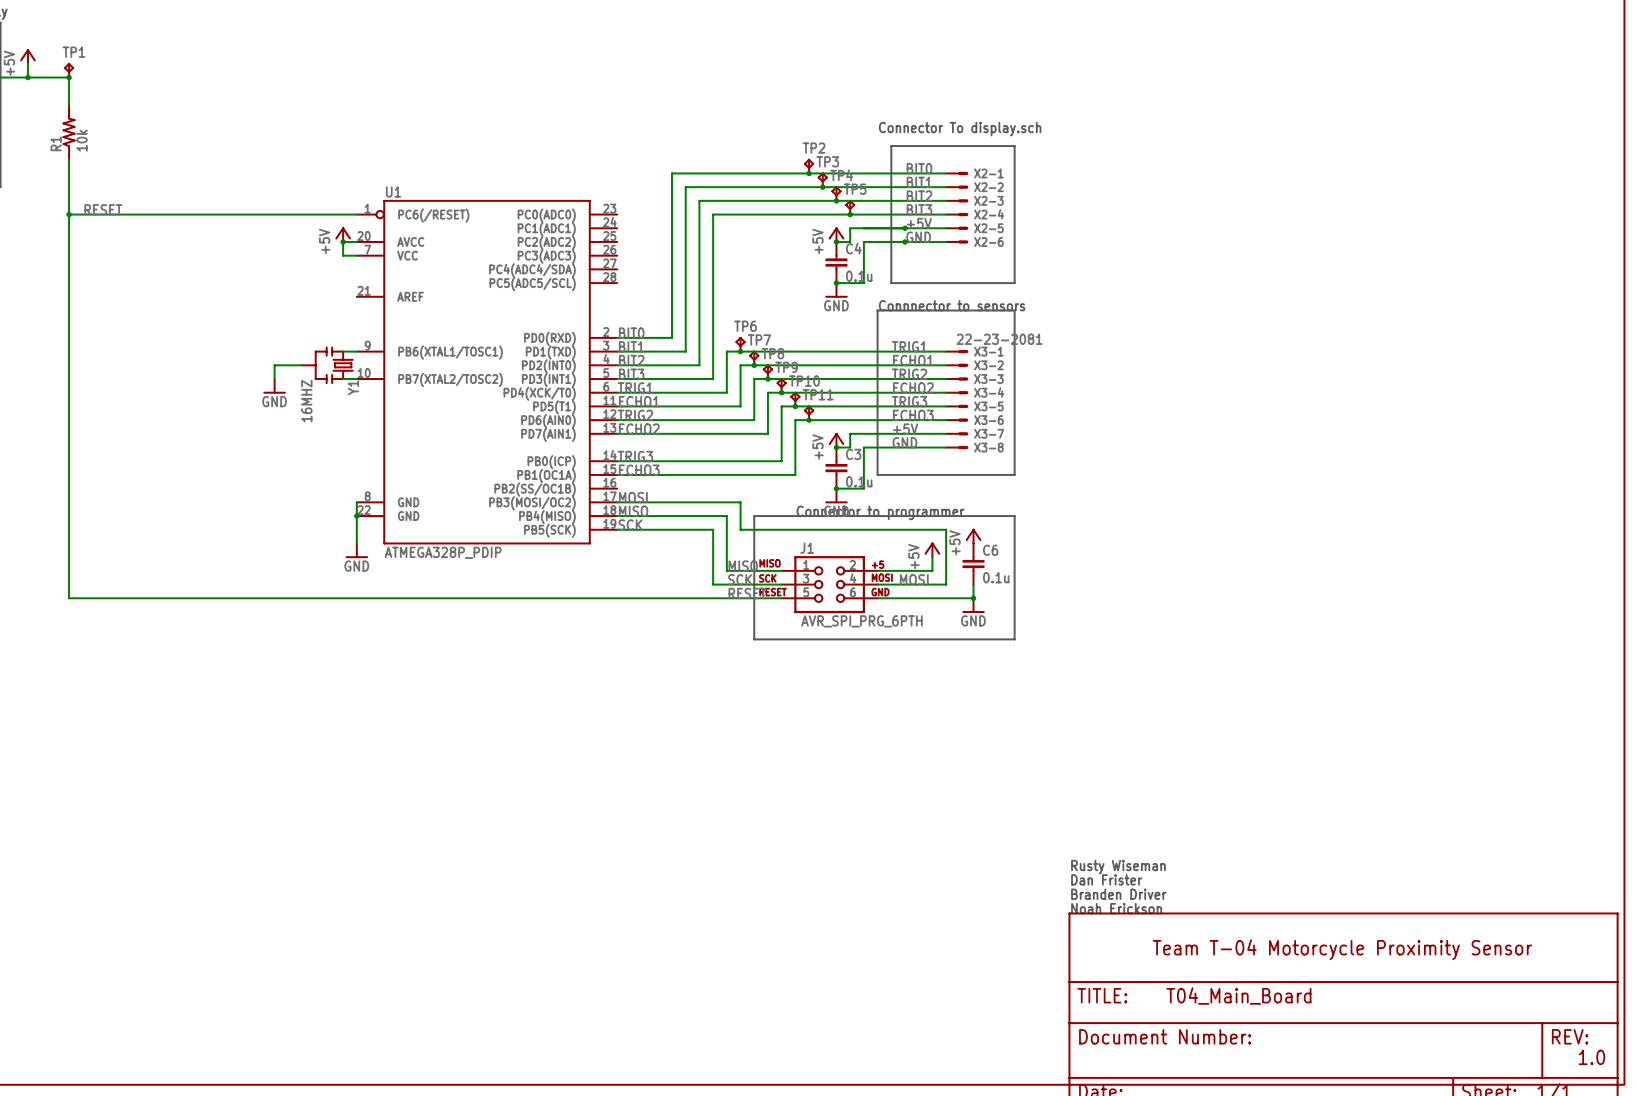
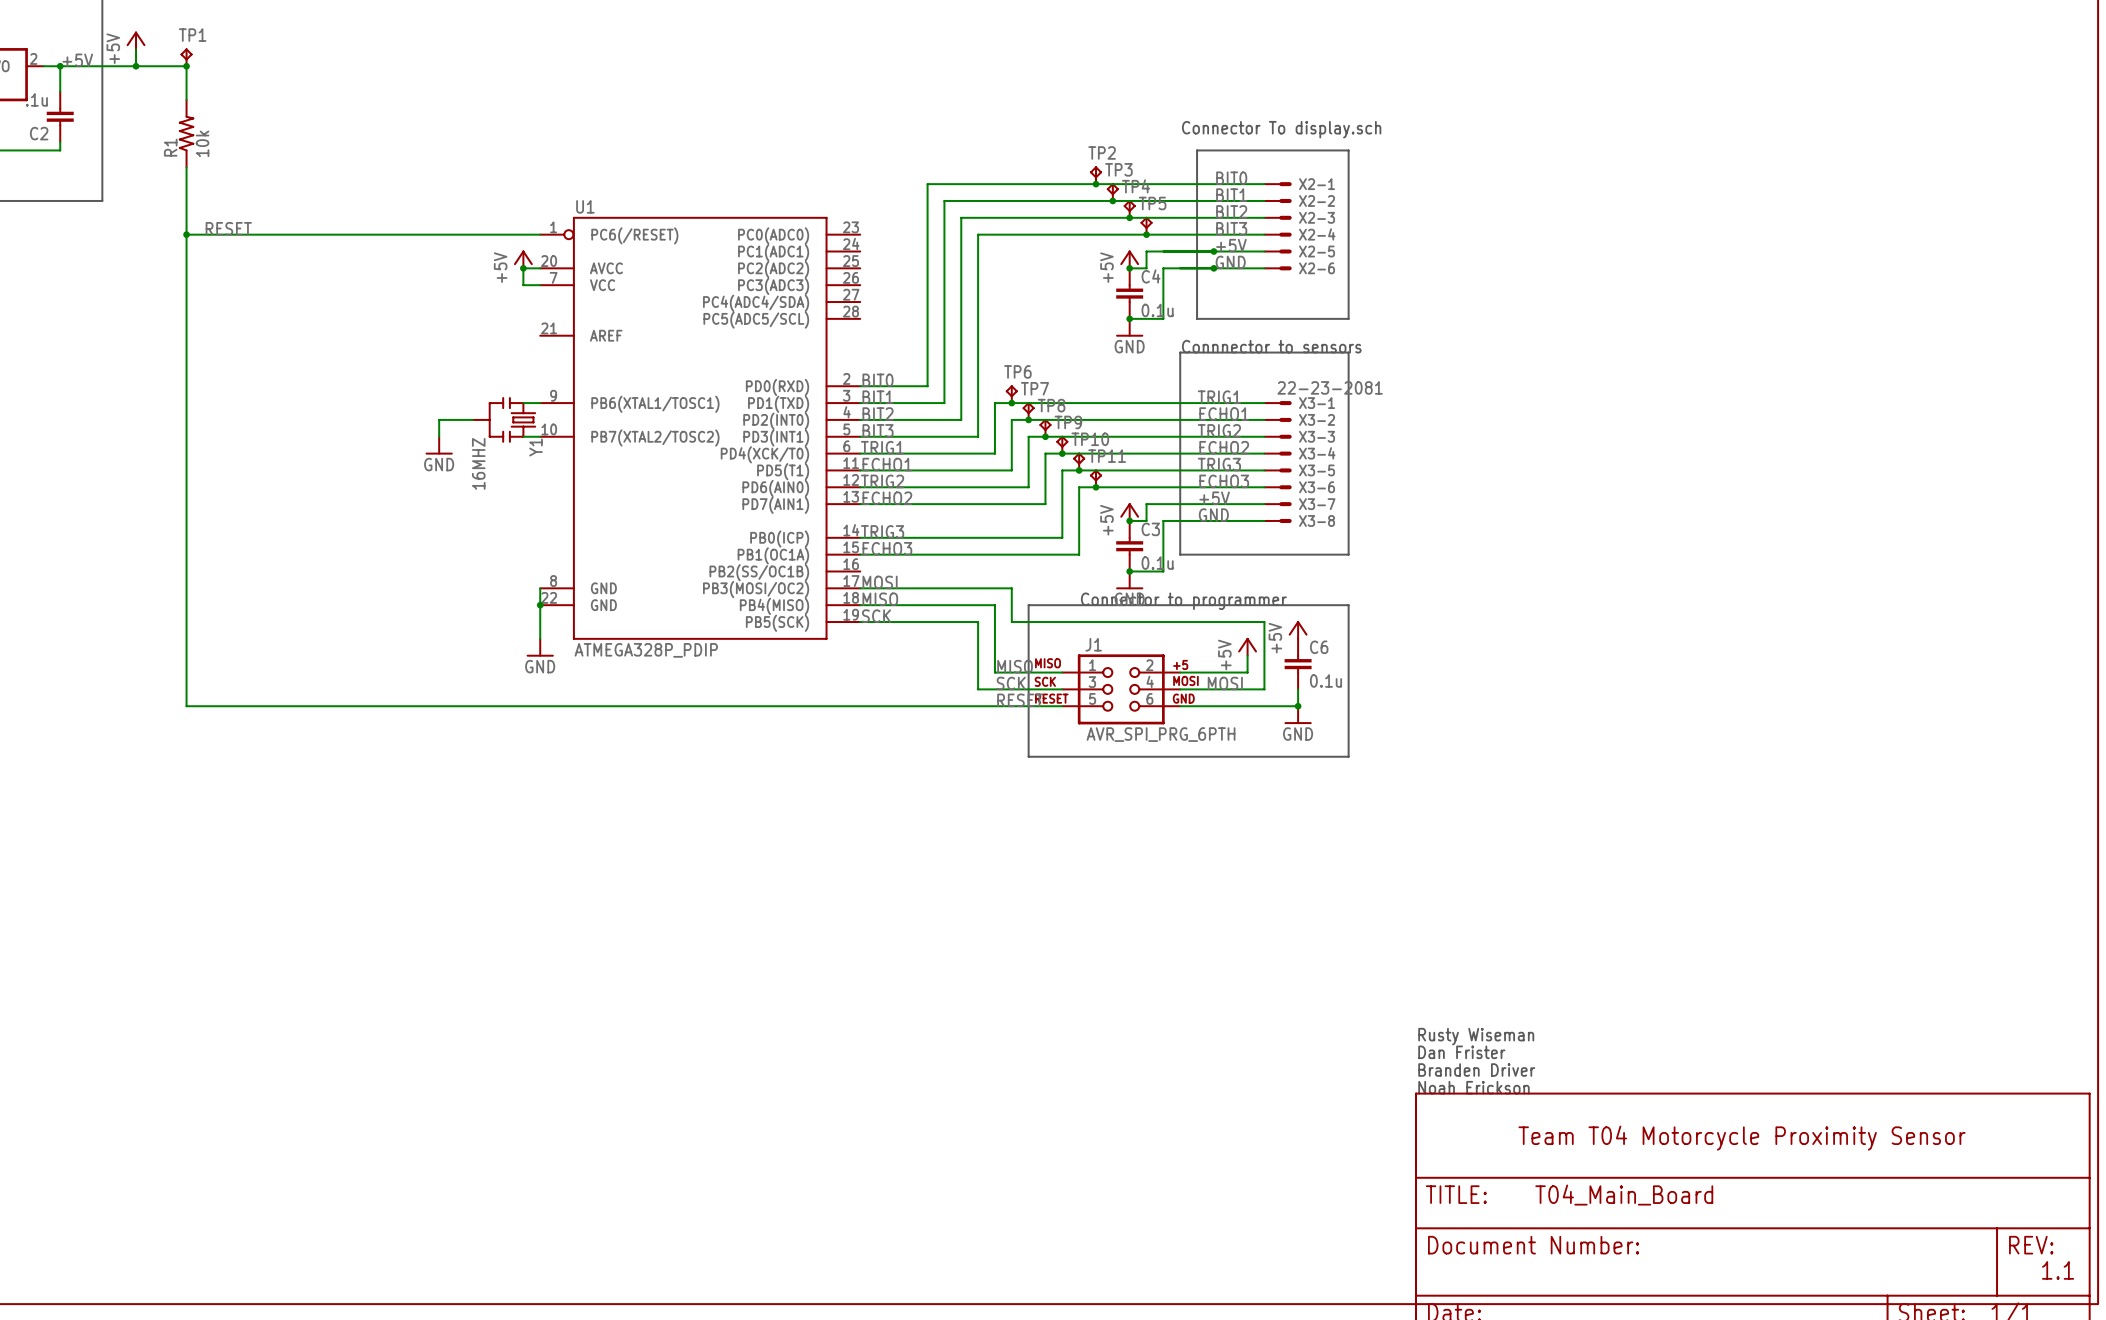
text: Team T-04 Motorcycle Proximity Sensor (1342, 949) -> Team T04 Motorcycle Proximity Sensor (1742, 1138)
text: 1.0 (1591, 1057) -> 1.1 (2058, 1270)

